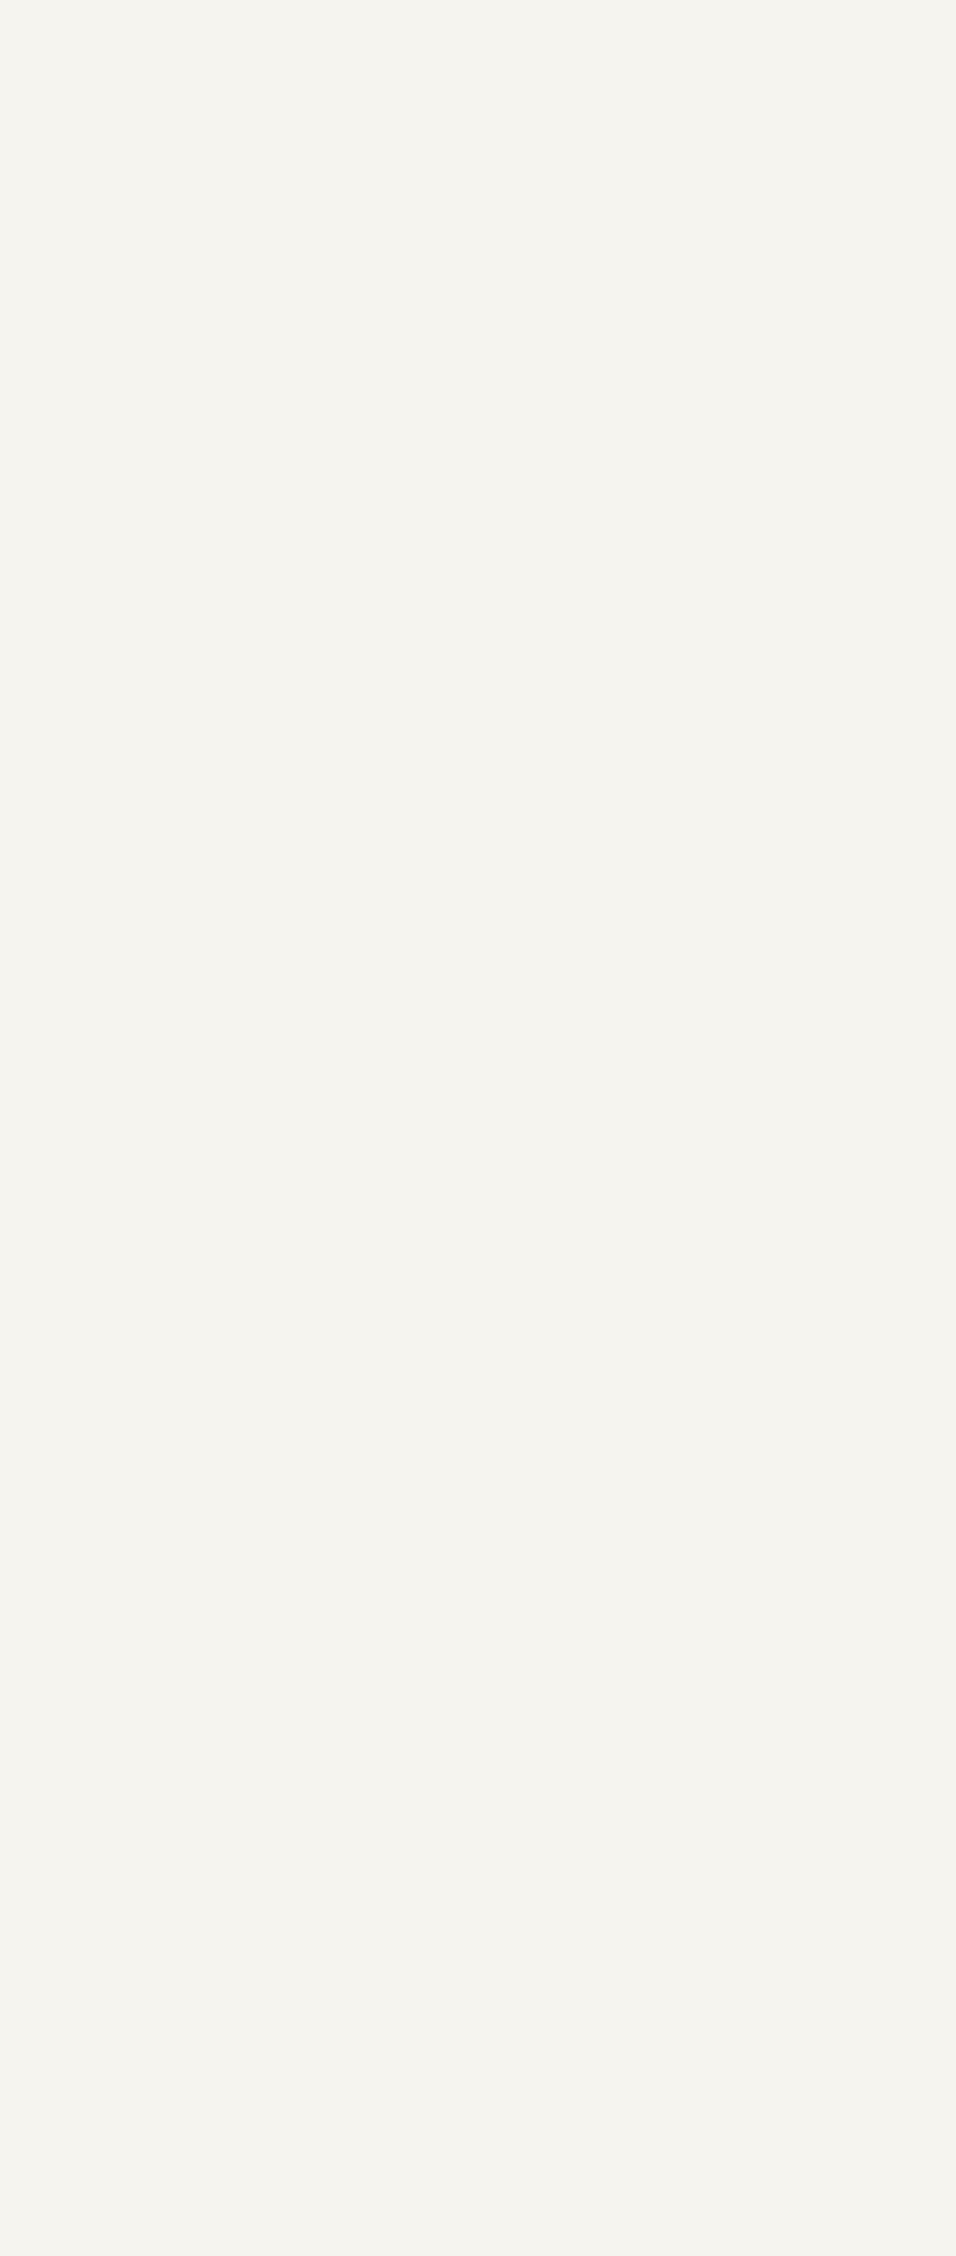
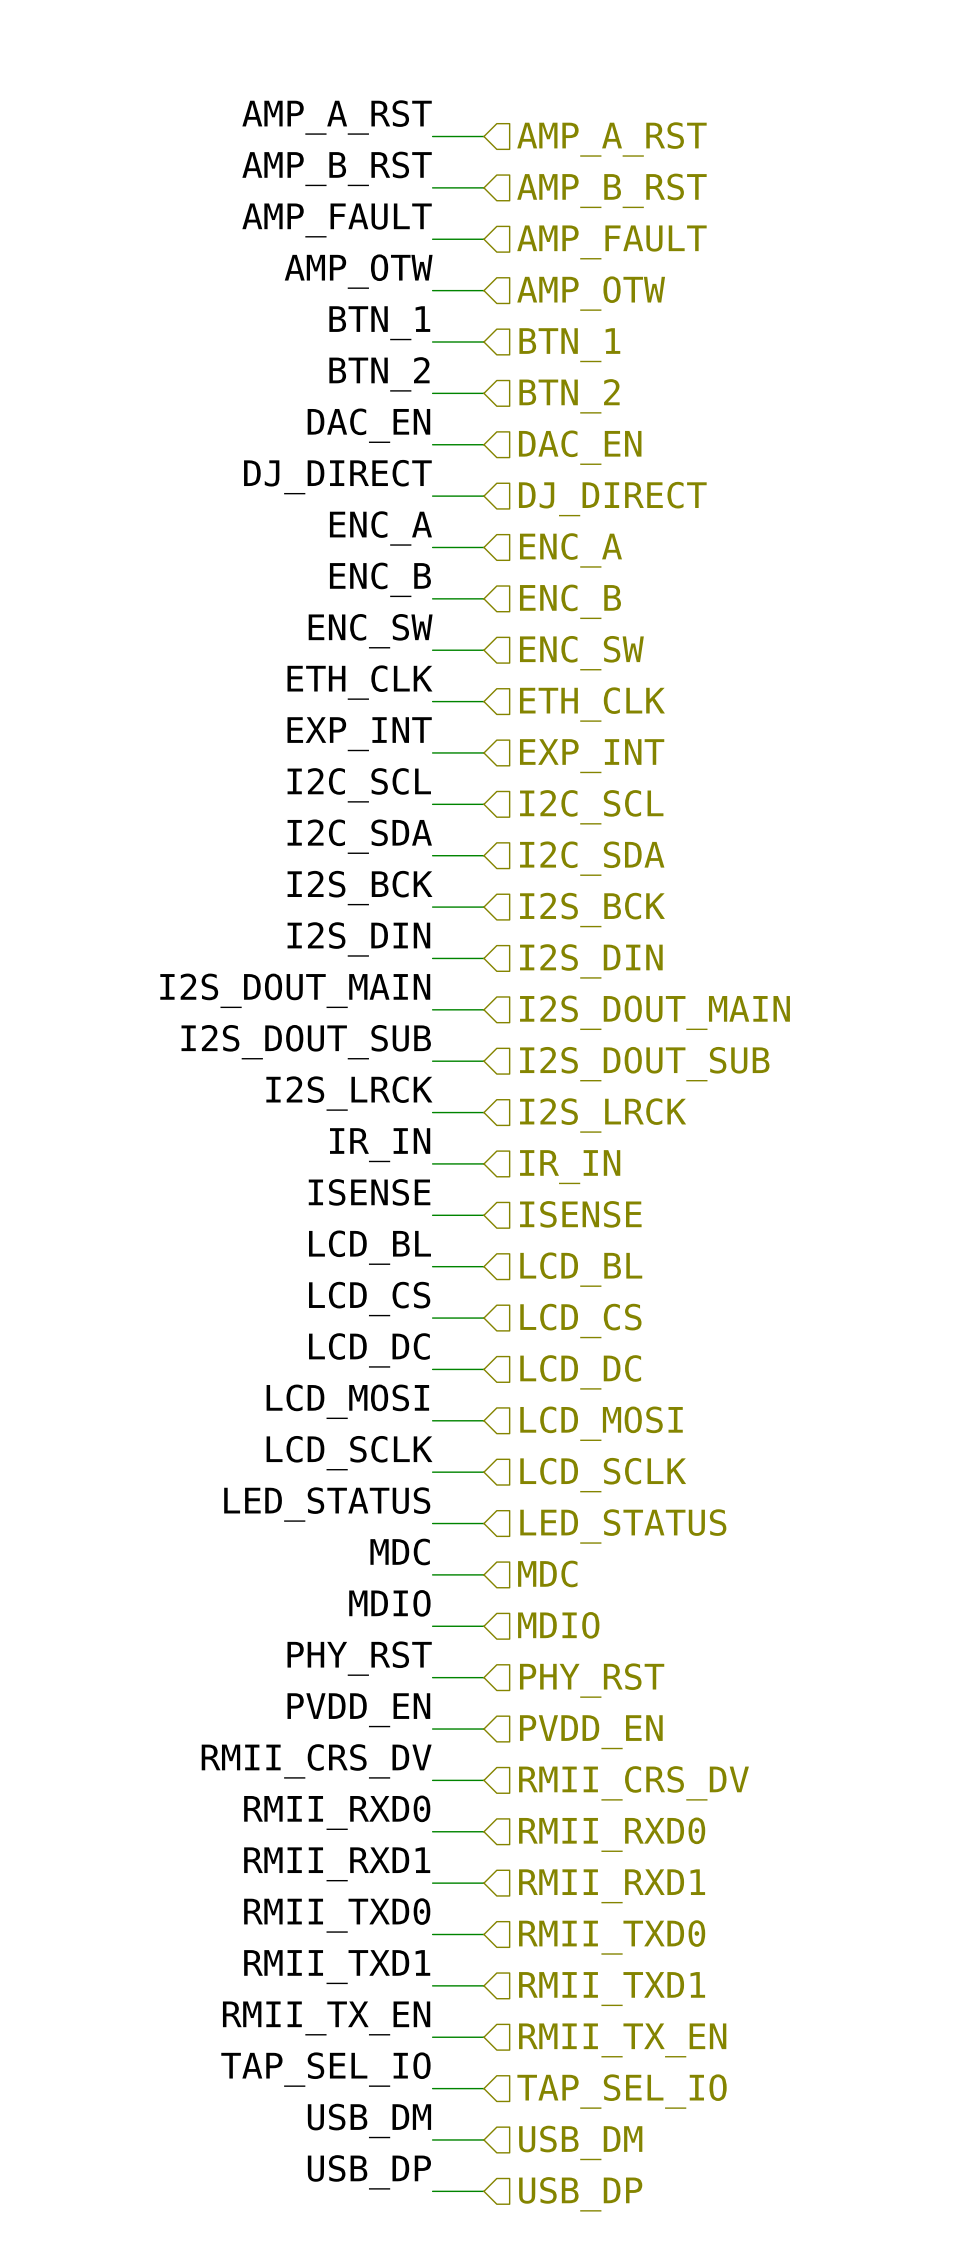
label: none -> AMP_A_RST (337, 117)
wire: none -> (432, 136) (483, 136)
hierarchical label: none -> AMP_A_RST (611, 139)
label: none -> AMP_B_RST (337, 168)
wire: none -> (432, 187) (483, 187)
hierarchical label: none -> AMP_B_RST (611, 190)
label: none -> AMP_FAULT (337, 220)
wire: none -> (432, 239) (483, 239)
hierarchical label: none -> AMP_FAULT (611, 242)
label: none -> AMP_OTW (358, 271)
wire: none -> (432, 290) (483, 290)
hierarchical label: none -> AMP_OTW (591, 293)
label: none -> BTN_1 (379, 323)
wire: none -> (432, 341) (483, 341)
hierarchical label: none -> BTN_1 (569, 345)
label: none -> BTN_2 (379, 374)
wire: none -> (432, 393) (483, 393)
hierarchical label: none -> BTN_2 (569, 396)
label: none -> DAC_EN (368, 425)
wire: none -> (432, 444) (483, 444)
hierarchical label: none -> DAC_EN (580, 447)
label: none -> DJ_DIRECT (337, 477)
wire: none -> (432, 496) (483, 496)
hierarchical label: none -> DJ_DIRECT (612, 499)
label: none -> ENC_A (380, 528)
wire: none -> (432, 547) (483, 547)
hierarchical label: none -> ENC_A (570, 550)
label: none -> ENC_B (380, 579)
wire: none -> (432, 598) (483, 598)
hierarchical label: none -> ENC_B (570, 601)
label: none -> ENC_SW (370, 631)
wire: none -> (432, 650) (483, 650)
hierarchical label: none -> ENC_SW (581, 653)
label: none -> ETH_CLK (359, 682)
wire: none -> (432, 701) (483, 701)
hierarchical label: none -> ETH_CLK (592, 704)
label: none -> EXP_INT (359, 734)
wire: none -> (432, 752) (483, 752)
hierarchical label: none -> EXP_INT (592, 756)
label: none -> I2C_SCL (359, 785)
wire: none -> (432, 804) (483, 804)
hierarchical label: none -> I2C_SCL (591, 807)
label: none -> I2C_SDA (359, 836)
wire: none -> (432, 855) (483, 855)
hierarchical label: none -> I2C_SDA (592, 858)
label: none -> I2S_BCK (360, 888)
wire: none -> (432, 907) (483, 907)
hierarchical label: none -> I2S_BCK (592, 910)
label: none -> I2S_DIN (358, 939)
wire: none -> (432, 958) (483, 958)
hierarchical label: none -> I2S_DIN (591, 961)
label: none -> I2S_DOUT_MAIN (295, 990)
wire: none -> (432, 1009) (483, 1009)
hierarchical label: none -> I2S_DOUT_MAIN (654, 1012)
label: none -> I2S_DOUT_SUB (306, 1042)
wire: none -> (432, 1061) (483, 1061)
hierarchical label: none -> I2S_DOUT_SUB (644, 1064)
label: none -> I2S_LRCK (349, 1093)
wire: none -> (432, 1112) (483, 1112)
hierarchical label: none -> I2S_LRCK (603, 1115)
label: none -> IR_IN (380, 1145)
wire: none -> (432, 1163) (483, 1163)
hierarchical label: none -> IR_IN (570, 1167)
label: none -> ISENSE (369, 1192)
hierarchical label: none -> ISENSE (580, 1214)
wire: none -> (432, 1215) (483, 1215)
label: none -> LCD_BL (370, 1247)
wire: none -> (432, 1266) (483, 1266)
hierarchical label: none -> LCD_BL (581, 1269)
label: none -> LCD_CS (369, 1299)
wire: none -> (432, 1318) (483, 1318)
hierarchical label: none -> LCD_CS (580, 1321)
label: none -> LCD_DC (369, 1350)
wire: none -> (432, 1369) (483, 1369)
hierarchical label: none -> LCD_DC (580, 1372)
label: none -> LCD_MOSI (347, 1401)
wire: none -> (432, 1420) (483, 1420)
hierarchical label: none -> LCD_MOSI (601, 1423)
label: none -> LCD_SCLK (349, 1453)
wire: none -> (432, 1472) (483, 1472)
hierarchical label: none -> LCD_SCLK (603, 1475)
label: none -> LED_STATUS (327, 1504)
wire: none -> (432, 1523) (483, 1523)
hierarchical label: none -> LED_STATUS (623, 1526)
label: none -> MDC (400, 1552)
wire: none -> (432, 1574) (483, 1574)
hierarchical label: none -> MDC (547, 1573)
label: none -> MDIO (389, 1603)
hierarchical label: none -> MDIO (558, 1625)
wire: none -> (432, 1626) (483, 1626)
label: none -> PHY_RST (359, 1658)
wire: none -> (432, 1677) (483, 1677)
hierarchical label: none -> PHY_RST (592, 1680)
label: none -> PVDD_EN (358, 1710)
wire: none -> (432, 1729) (483, 1729)
hierarchical label: none -> PVDD_EN (591, 1732)
label: none -> RMII_CRS_DV (316, 1761)
wire: none -> (432, 1780) (483, 1780)
hierarchical label: none -> RMII_CRS_DV (633, 1783)
label: none -> RMII_RXD0 (337, 1812)
wire: none -> (432, 1831) (483, 1831)
hierarchical label: none -> RMII_RXD0 (612, 1834)
label: none -> RMII_RXD1 (337, 1864)
wire: none -> (432, 1883) (483, 1883)
hierarchical label: none -> RMII_RXD1 (612, 1886)
label: none -> RMII_TXD0 (337, 1915)
wire: none -> (432, 1934) (483, 1934)
hierarchical label: none -> RMII_TXD0 (612, 1937)
label: none -> RMII_TXD1 (337, 1967)
wire: none -> (432, 1985) (483, 1985)
hierarchical label: none -> RMII_TXD1 (612, 1989)
label: none -> RMII_TX_EN (326, 2018)
wire: none -> (432, 2037) (483, 2037)
hierarchical label: none -> RMII_TX_EN (622, 2040)
label: none -> TAP_SEL_IO (325, 2069)
wire: none -> (432, 2088) (483, 2088)
hierarchical label: none -> TAP_SEL_IO (622, 2091)
label: none -> USB_DM (369, 2120)
wire: none -> (432, 2139) (483, 2139)
hierarchical label: none -> USB_DM (580, 2142)
label: none -> USB_DP (369, 2172)
wire: none -> (432, 2191) (483, 2191)
hierarchical label: none -> USB_DP (580, 2194)

